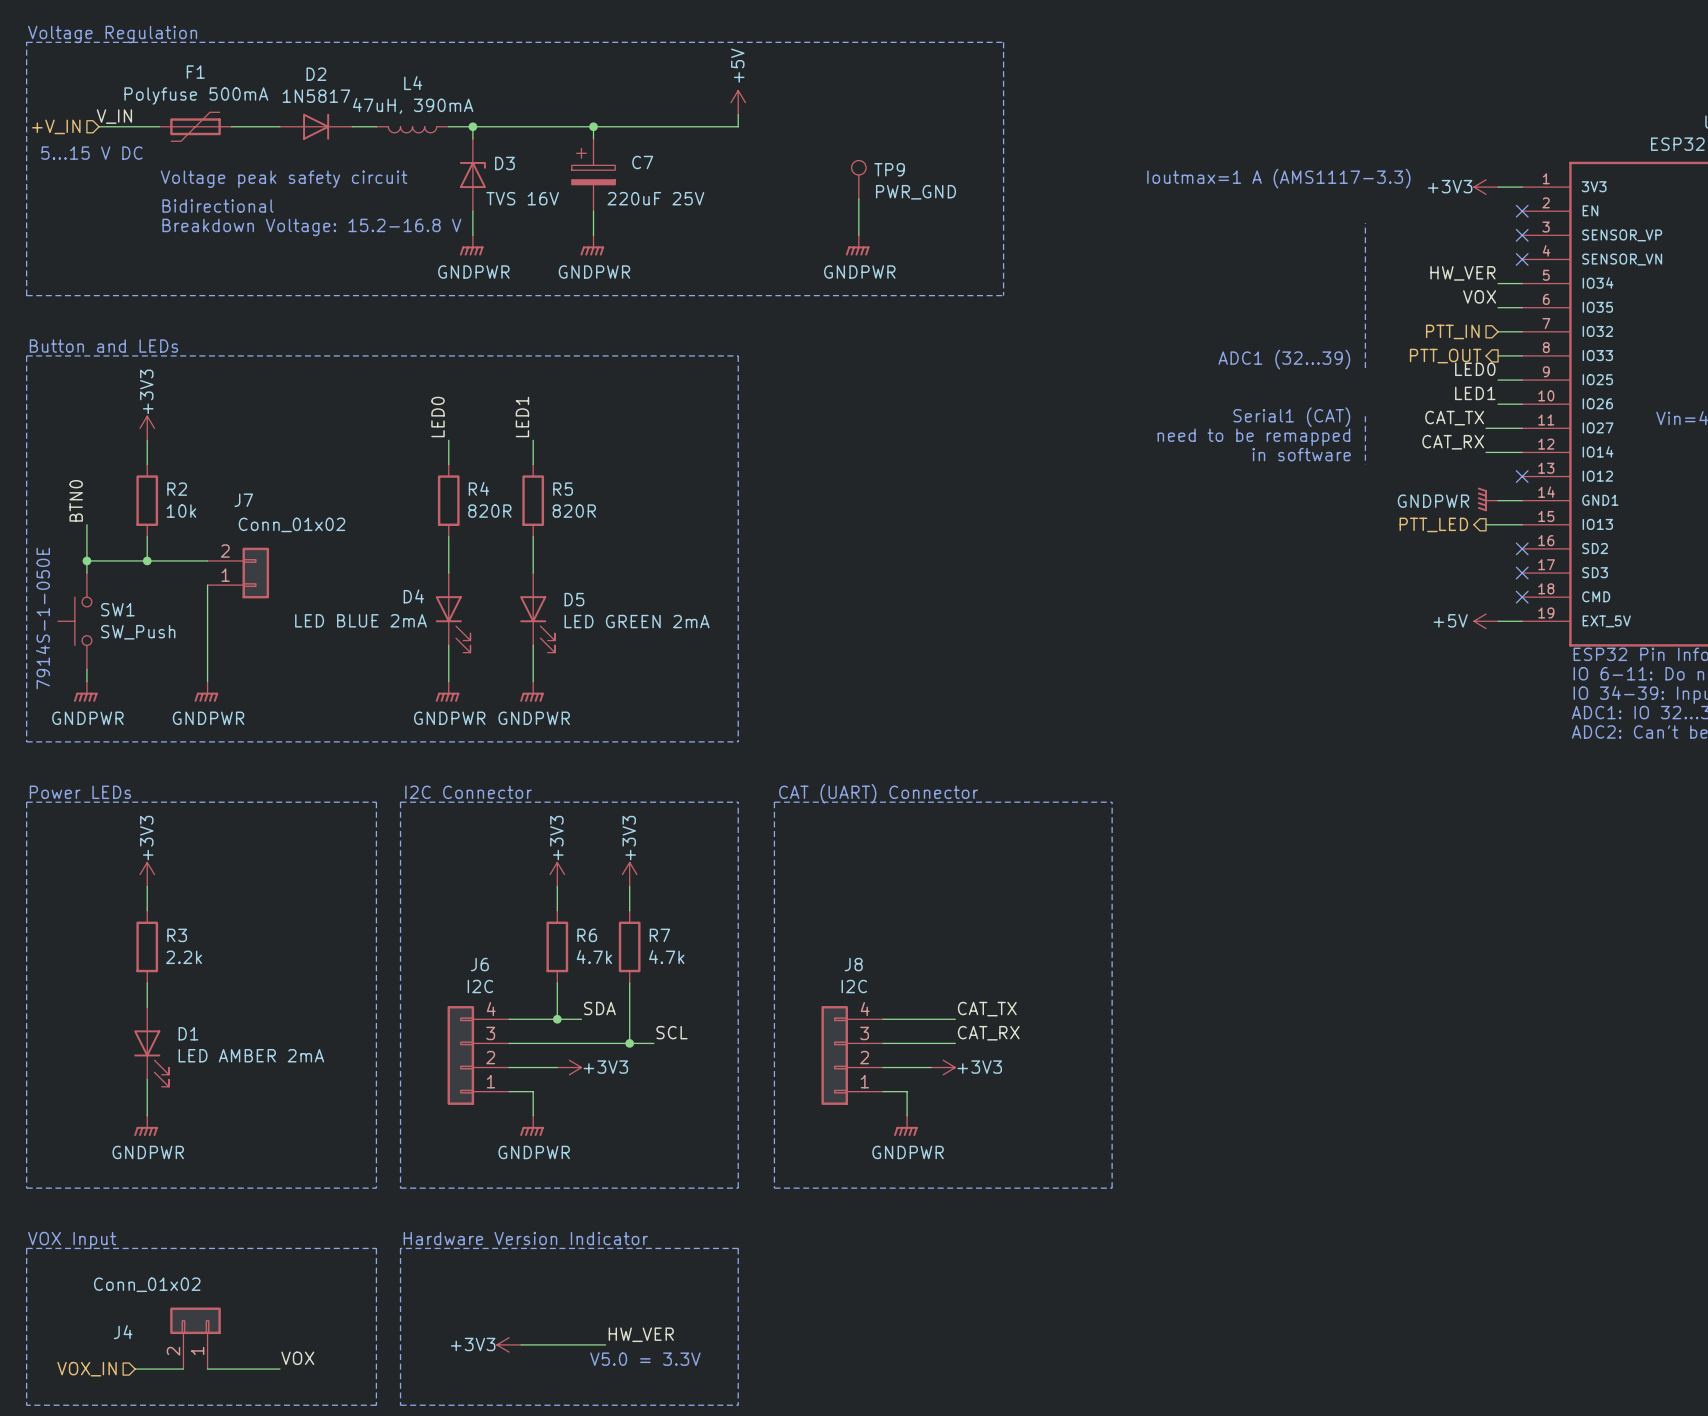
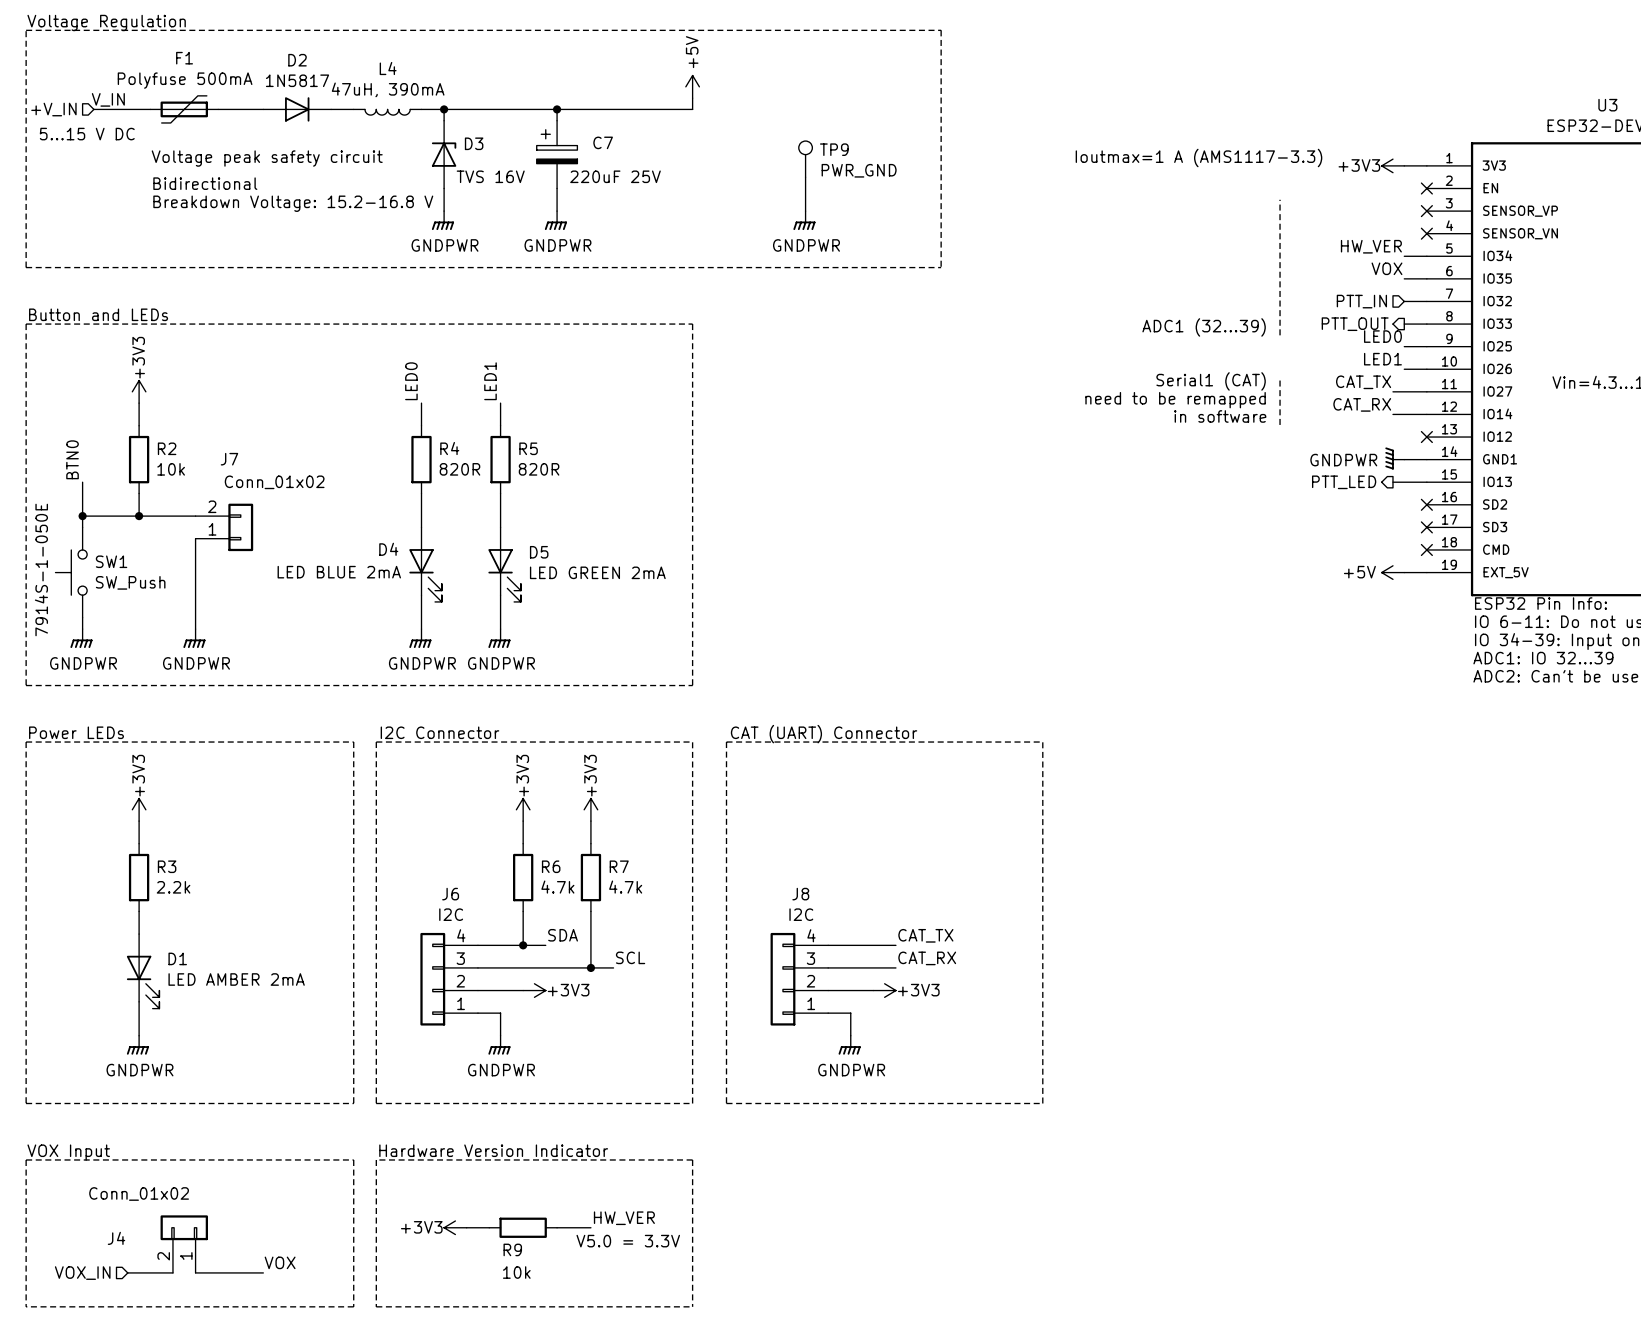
wire: none -> (466, 1227) (489, 1227)
R9: none -> 10k (523, 1227)
wire: none -> (557, 1227) (590, 1227)
label position: HW_VER (641, 1334) -> HW_VER (624, 1218)
power symbol position: +3V3 (509, 1344) -> +3V3 (455, 1227)
wire: (521, 1344) (605, 1344) -> none
text position: V5.0 = 3.3V (645, 1359) -> V5.0 = 3.3V (628, 1241)

